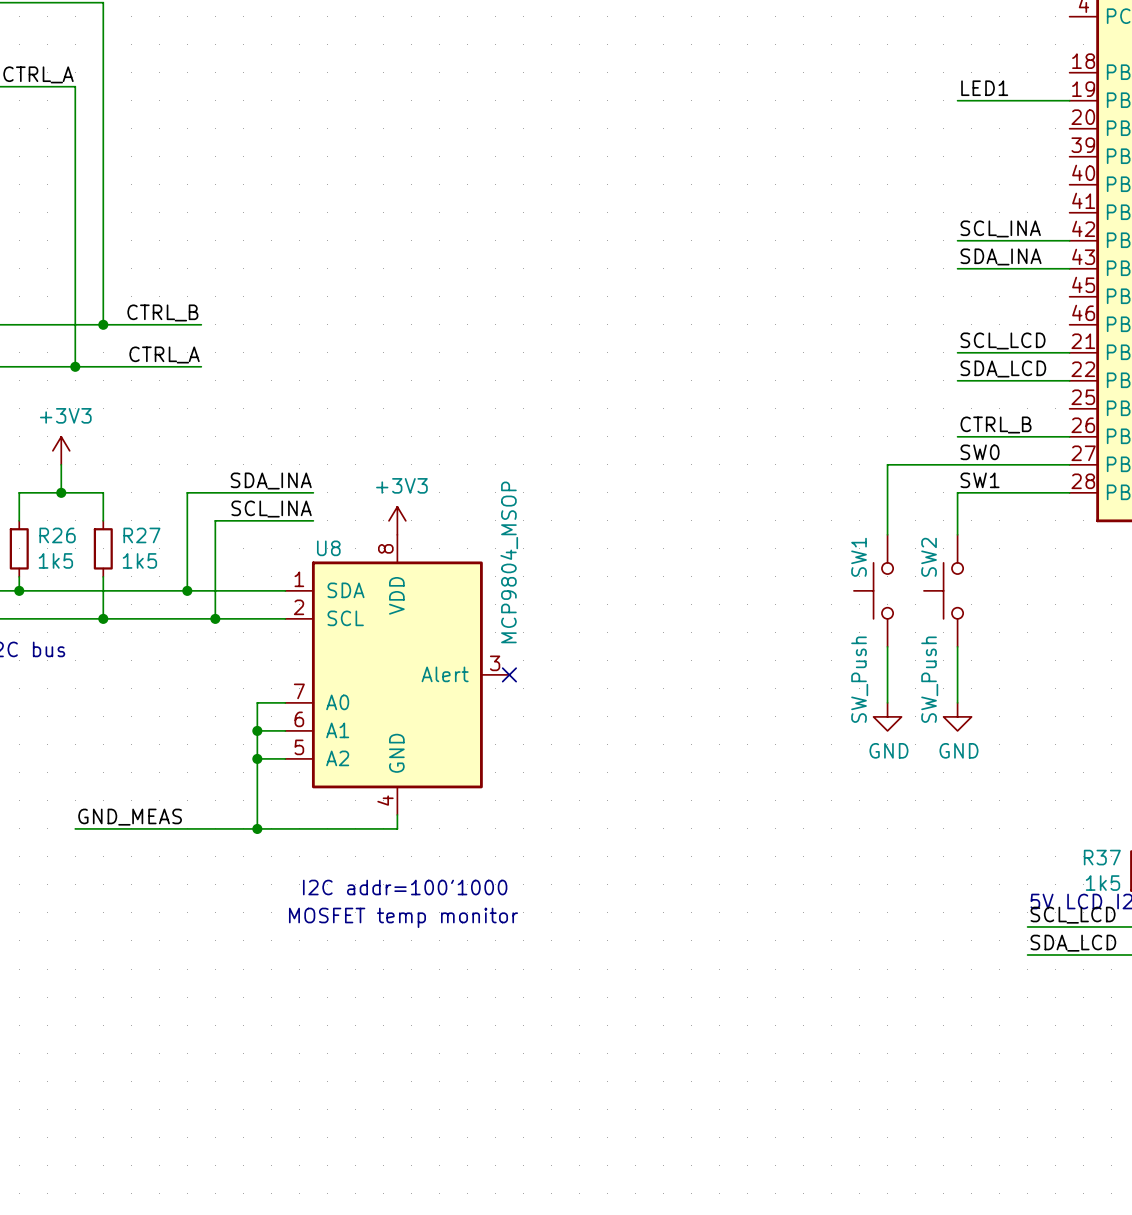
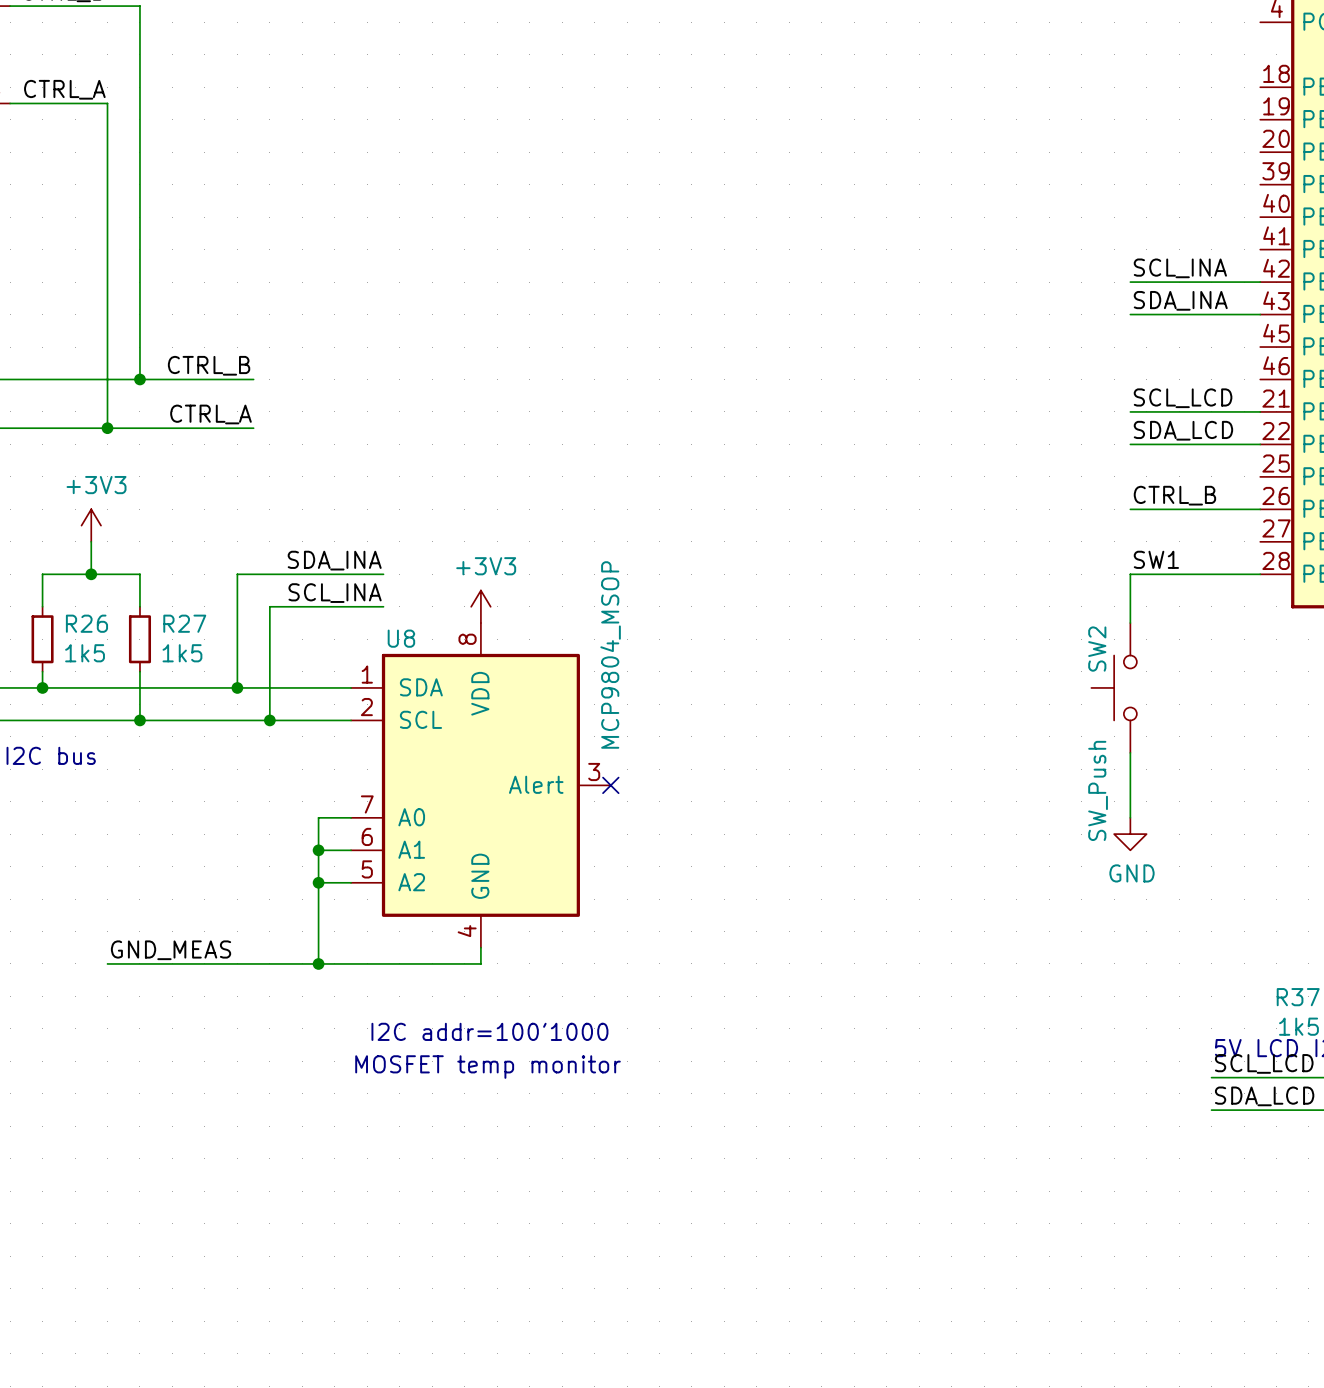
label: LED1 (984, 88) -> none
wire: (957, 100) (1069, 100) -> none
label: SW0 (980, 452) -> none
wire: (1069, 464) (887, 464) (887, 534) -> none
SW1: SW_Push (873, 590) -> none
wire: (887, 646) (887, 702) -> none
power symbol: GND (887, 716) -> none

